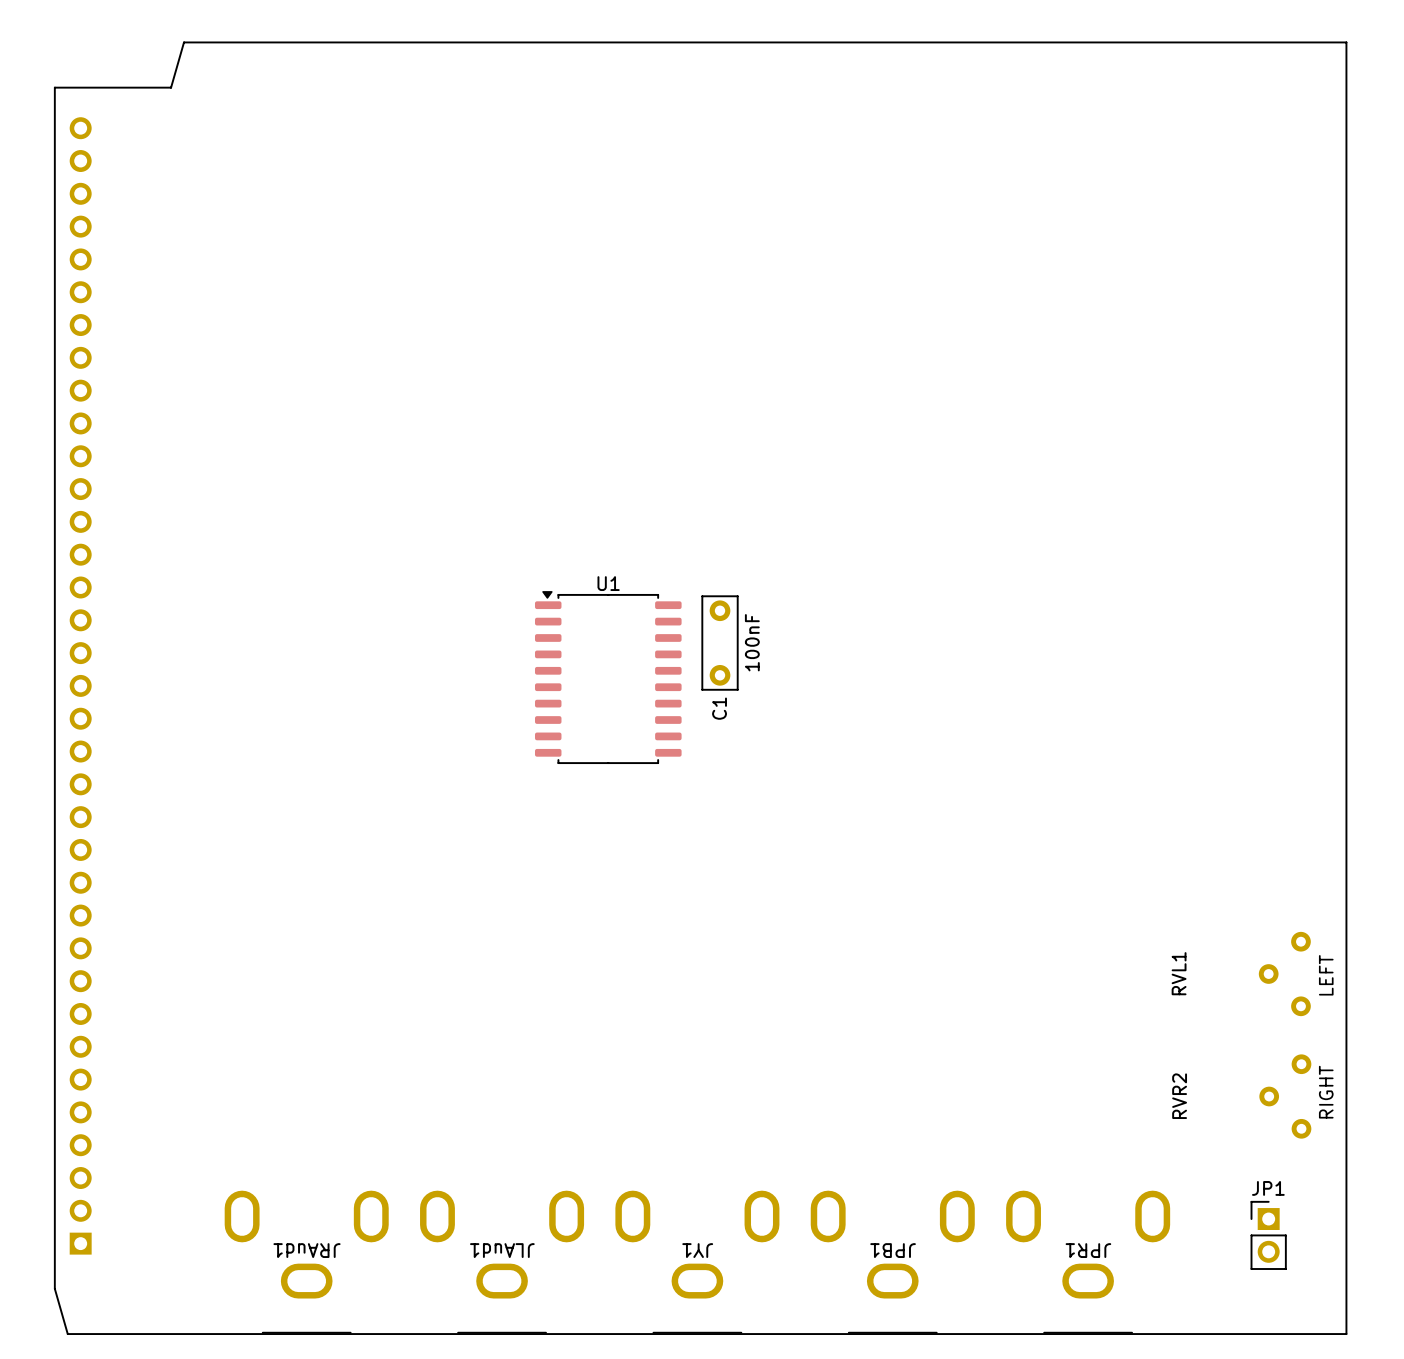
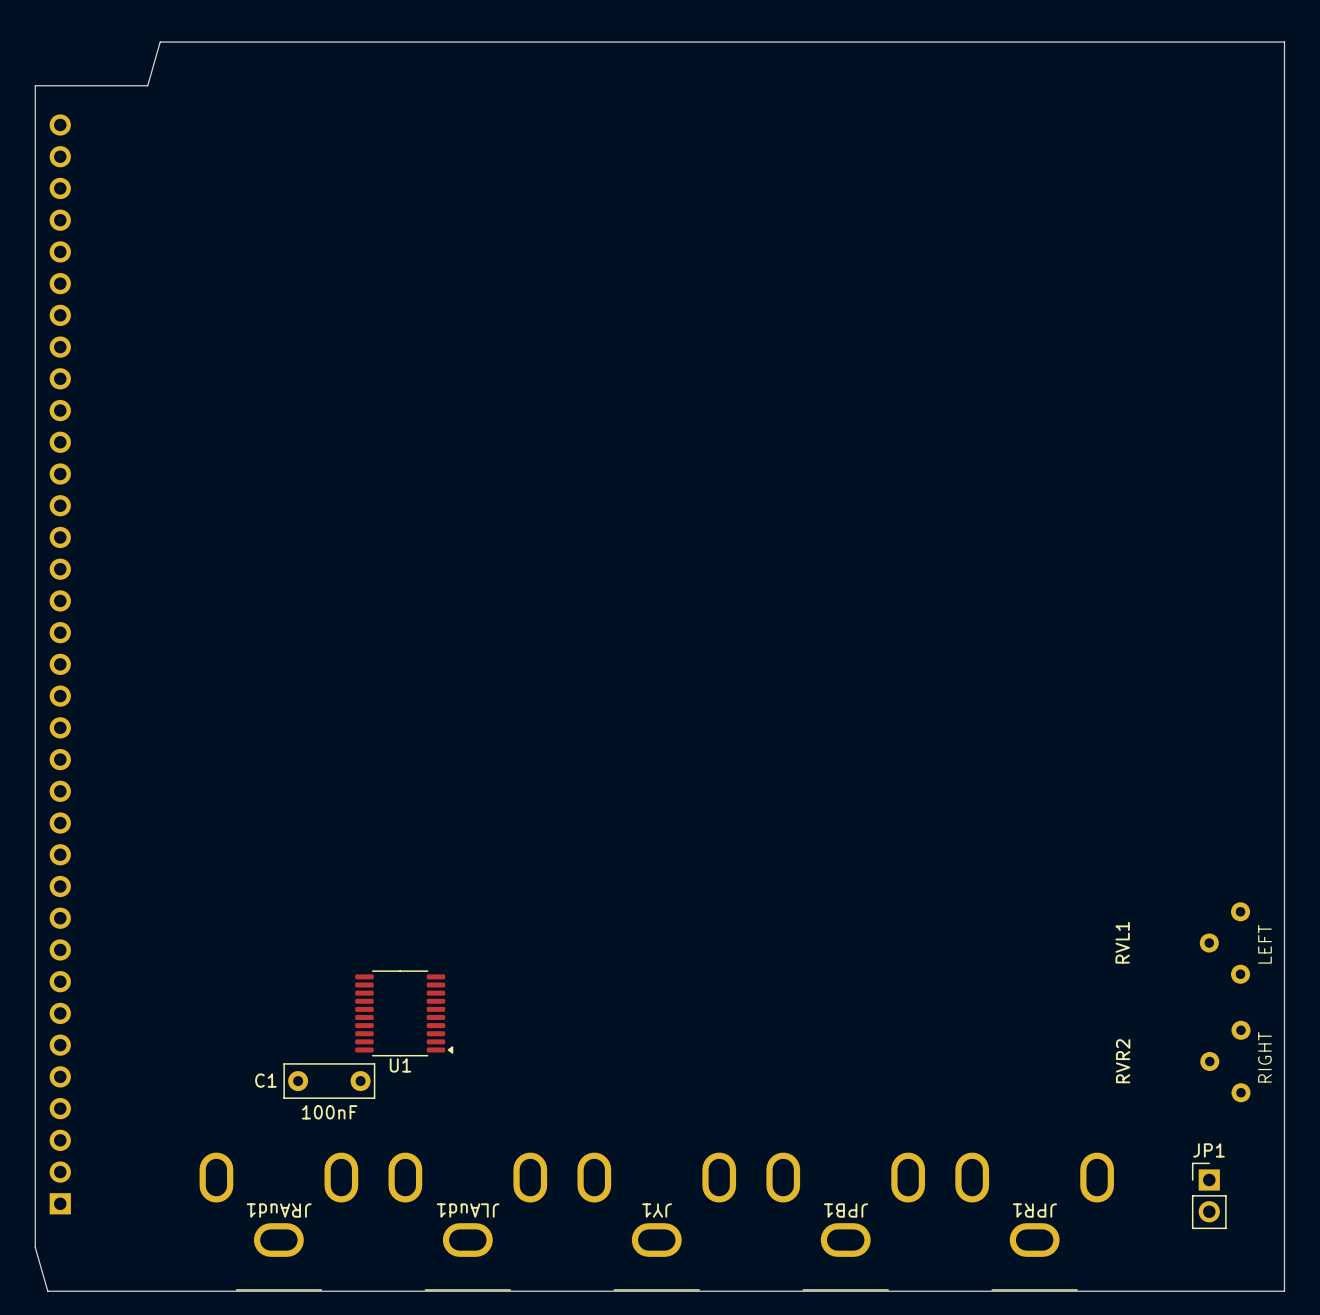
U1 name position: U1 (608, 583) -> U1 (400, 1065)
U1 footprint: [534, 591, 682, 764] -> [355, 970, 454, 1057]
C1 rotation: 0° (720, 643) -> 90° clockwise (329, 1081)
C1 position: (720, 643) -> (329, 1081)

